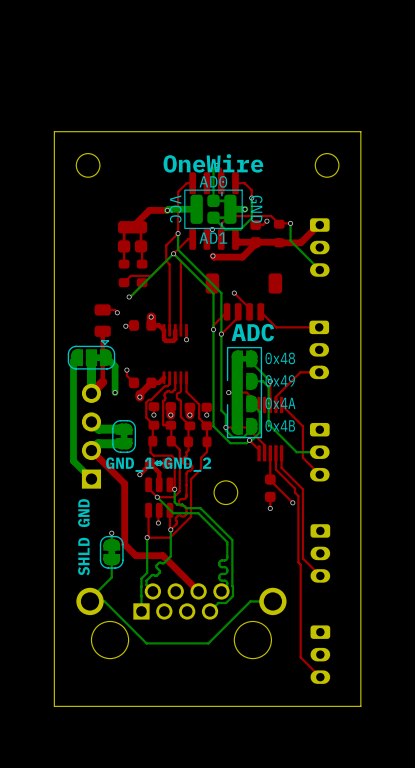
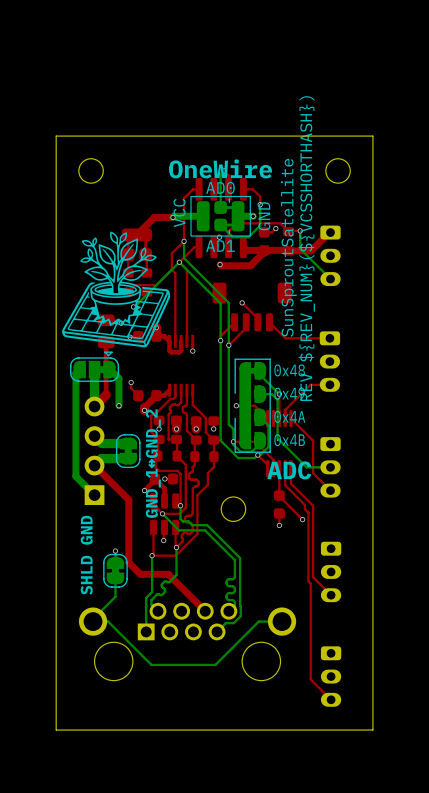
part footprint: [184, 189, 243, 229] -> [190, 195, 251, 237]
drawing: none -> [62, 231, 171, 348]
text: none -> SunSproutSatellite (288, 247)
text: none -> REV ${REV_NUM}(${VCSSHORTHASH}) (306, 248)
text position: ADC (252, 332) -> ADC (289, 470)
text rotation: 0° (158, 464) -> 90° counterclockwise (153, 463)

